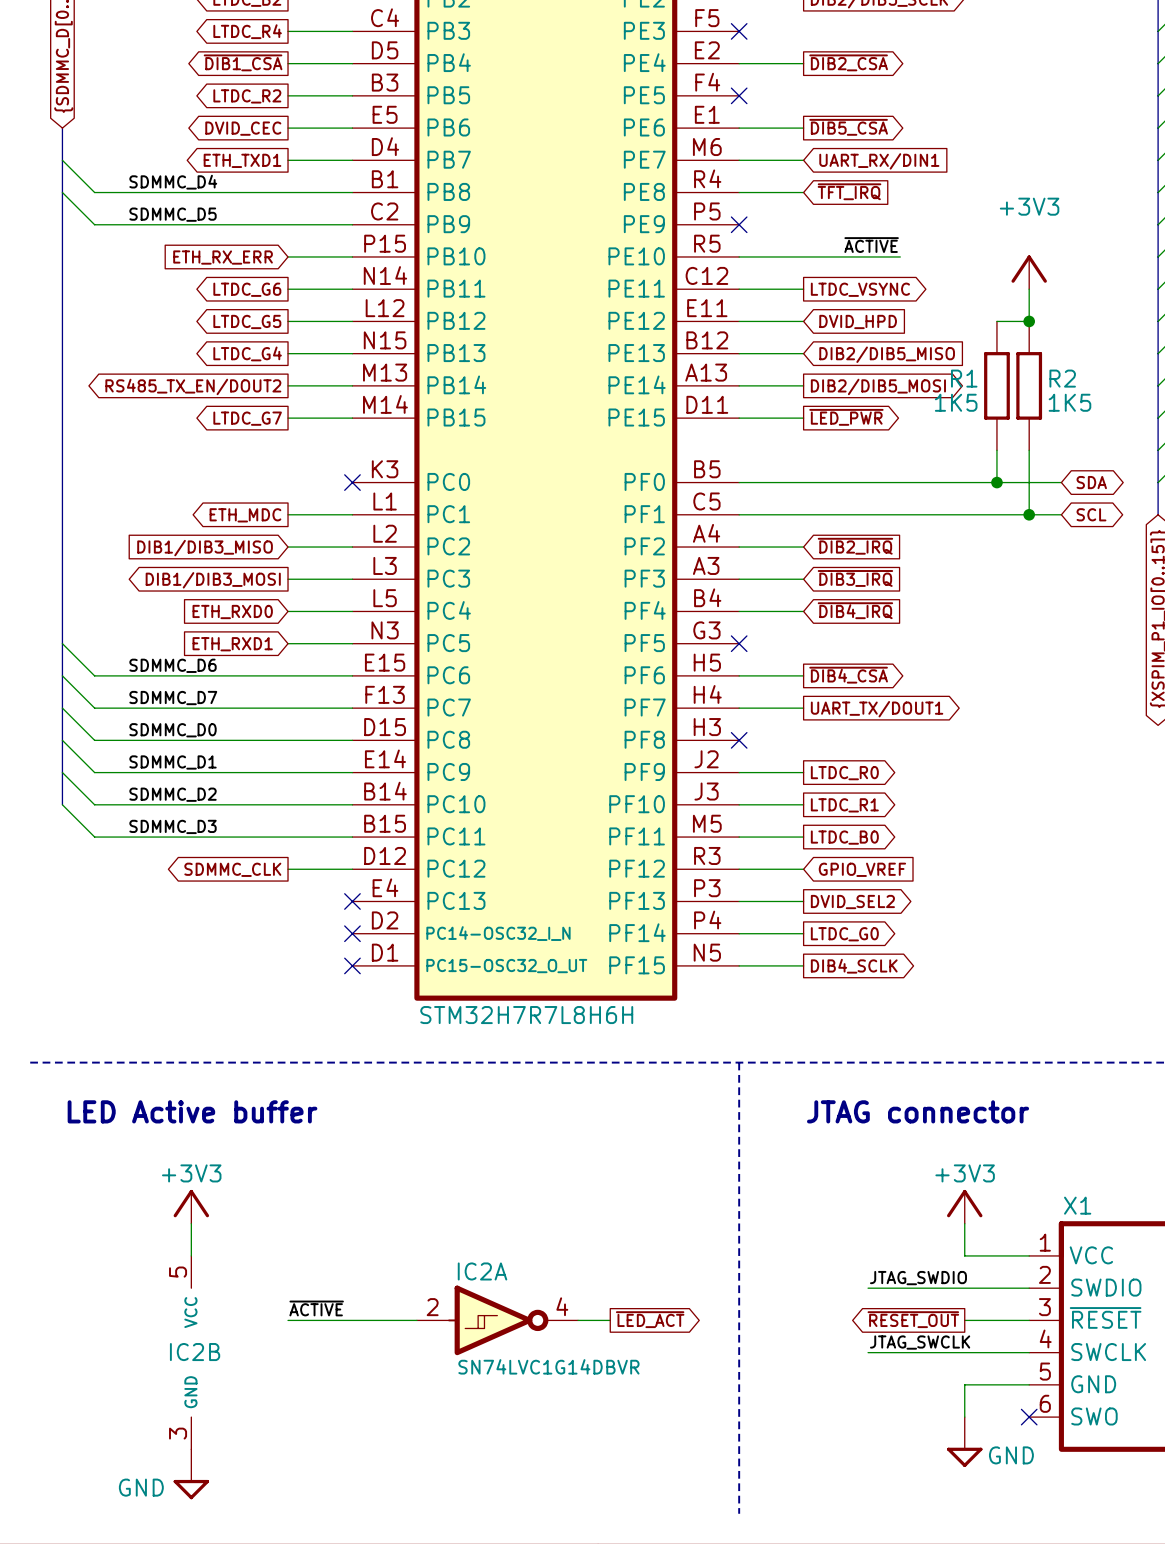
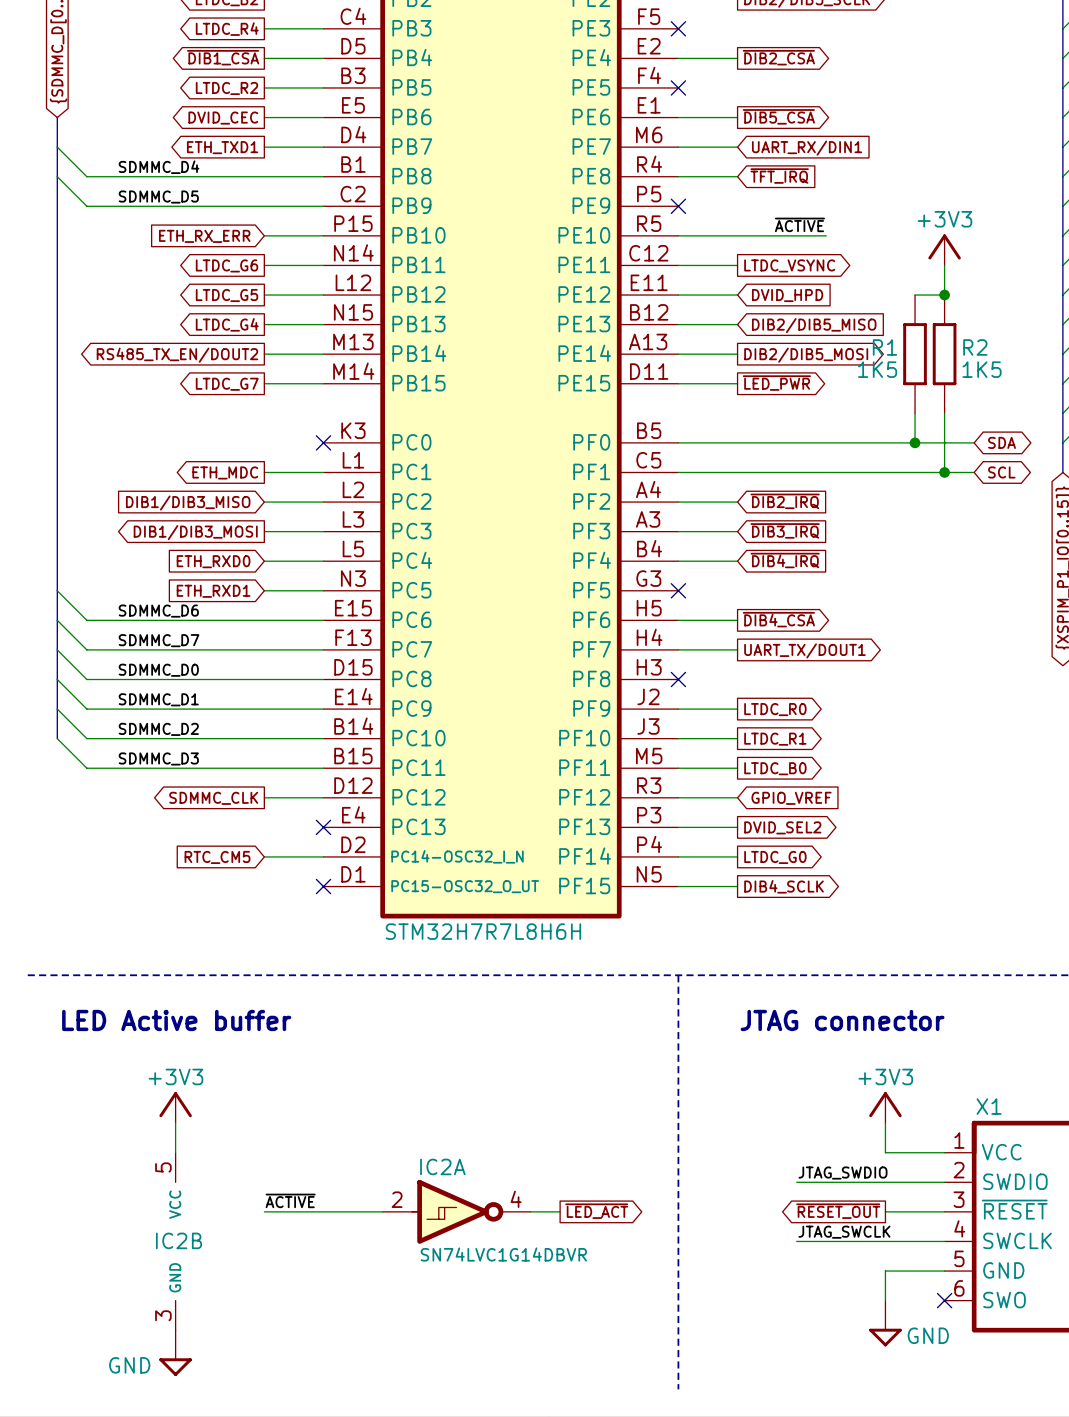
power symbol text position: +3V3 (1029, 206) -> +3V3 (944, 219)
wire: none -> (264, 856) (323, 856)
no-connect mark: (352, 933) -> none
global label: none -> RTC_CM5 (217, 857)

